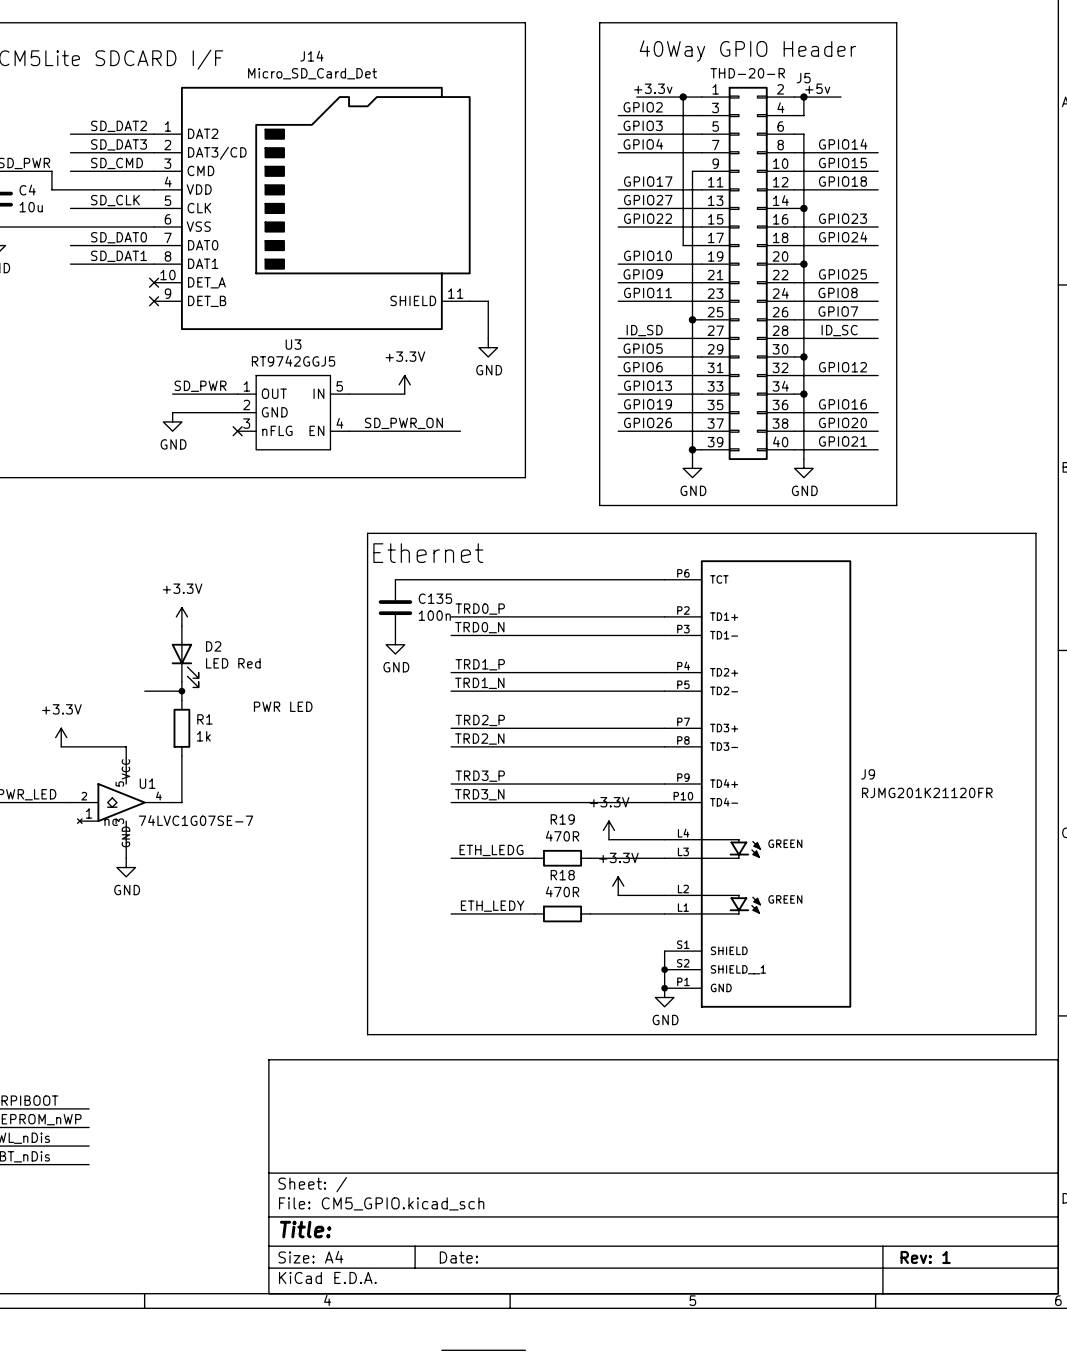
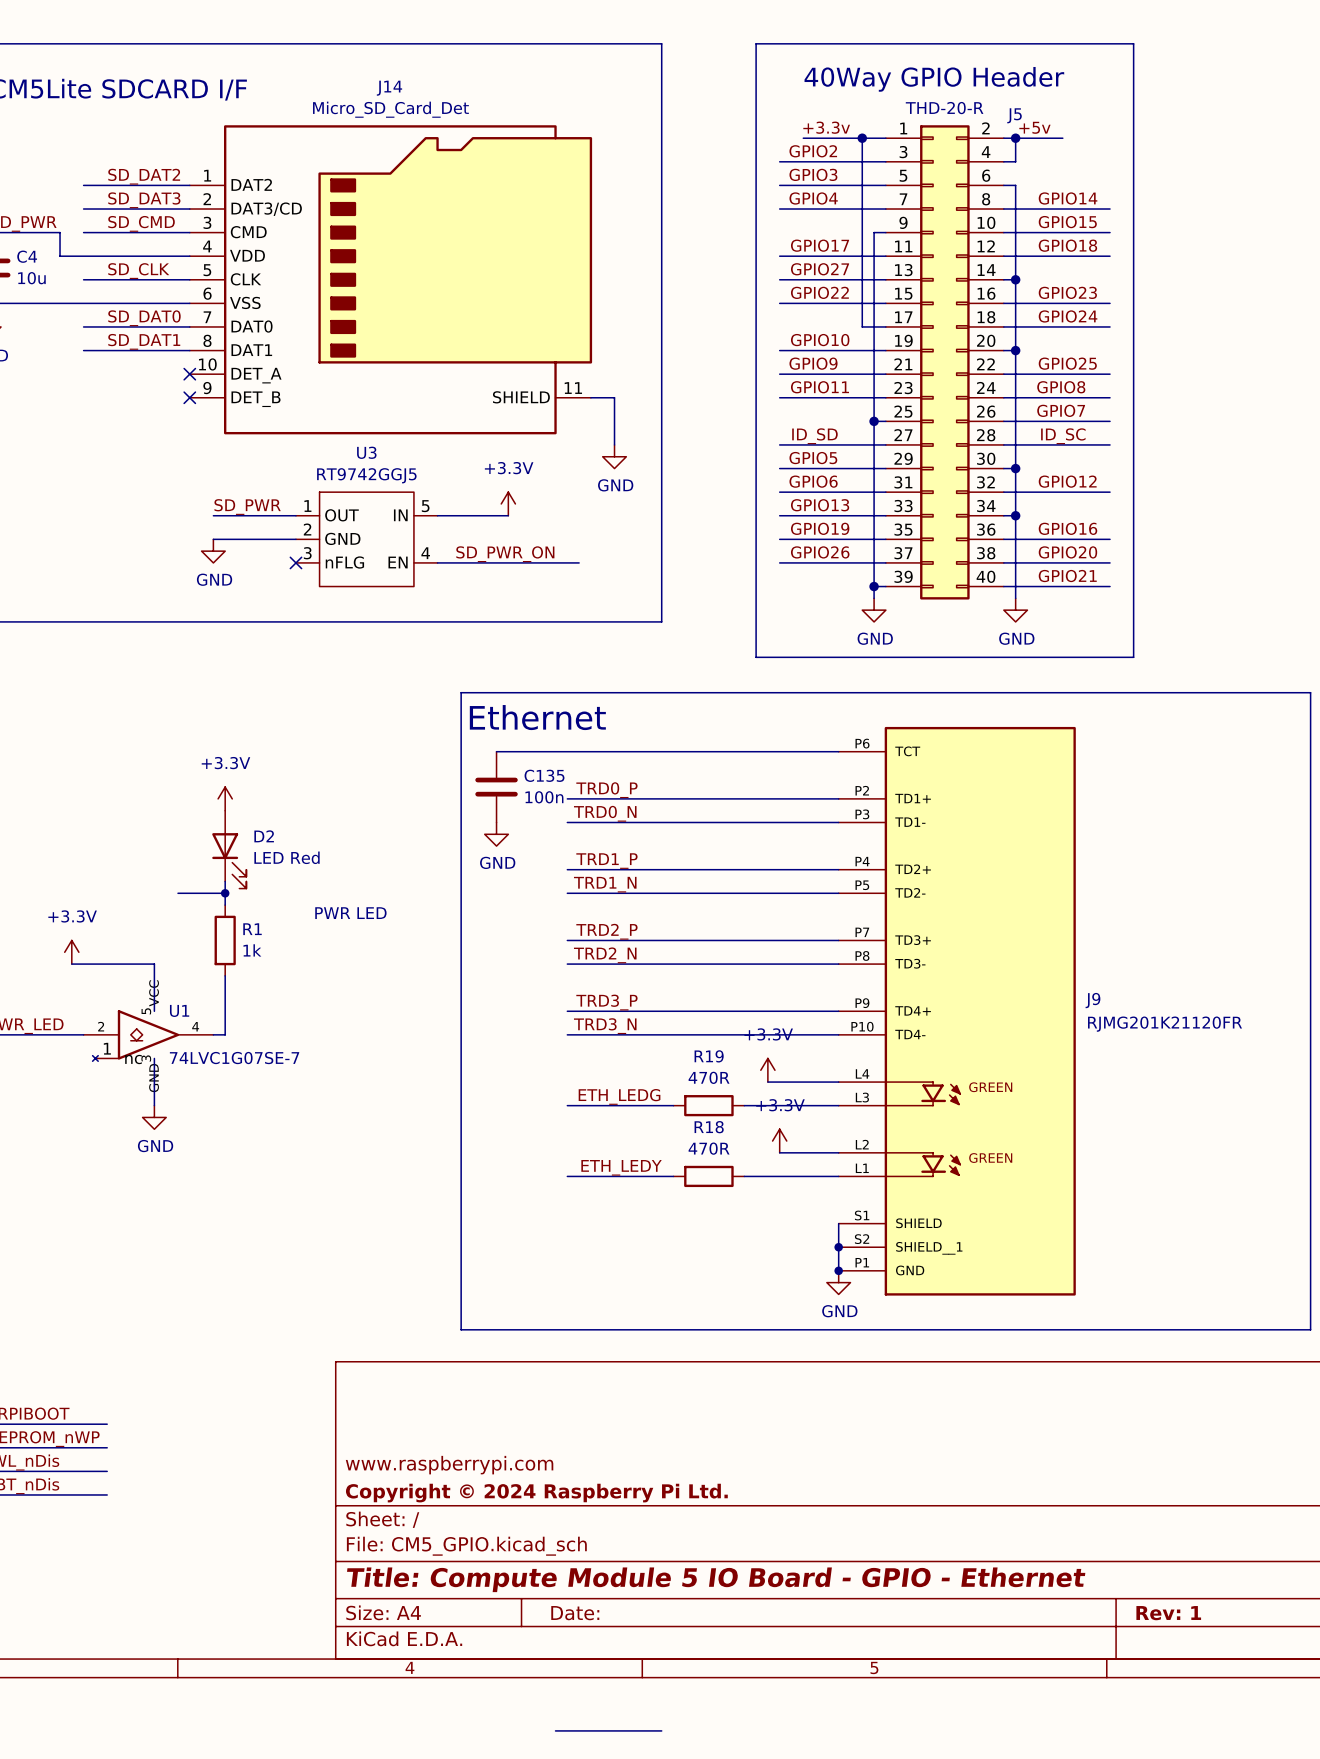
title block: none -> www.raspberrypi.com (449, 1465)
title block: none -> Copyright © 2024 Raspberry Pi Ltd. (536, 1493)
title block: Title: (305, 1229) -> Title: Compute Module 5 IO Board - GPIO - Ethernet (716, 1579)

